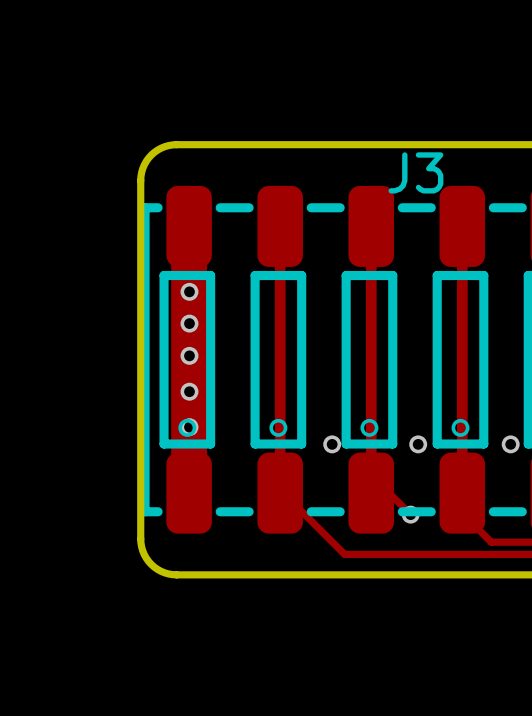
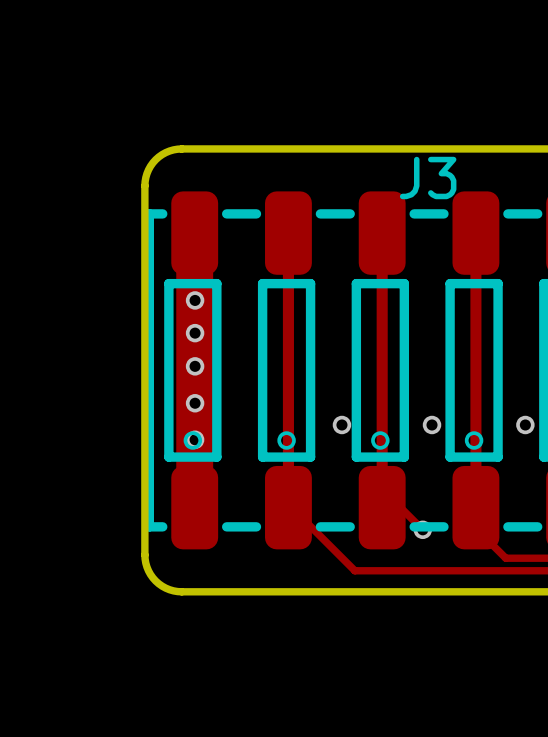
via position: (332, 444) -> (341, 424)
via position: (418, 444) -> (432, 424)
via position: (510, 444) -> (525, 424)

